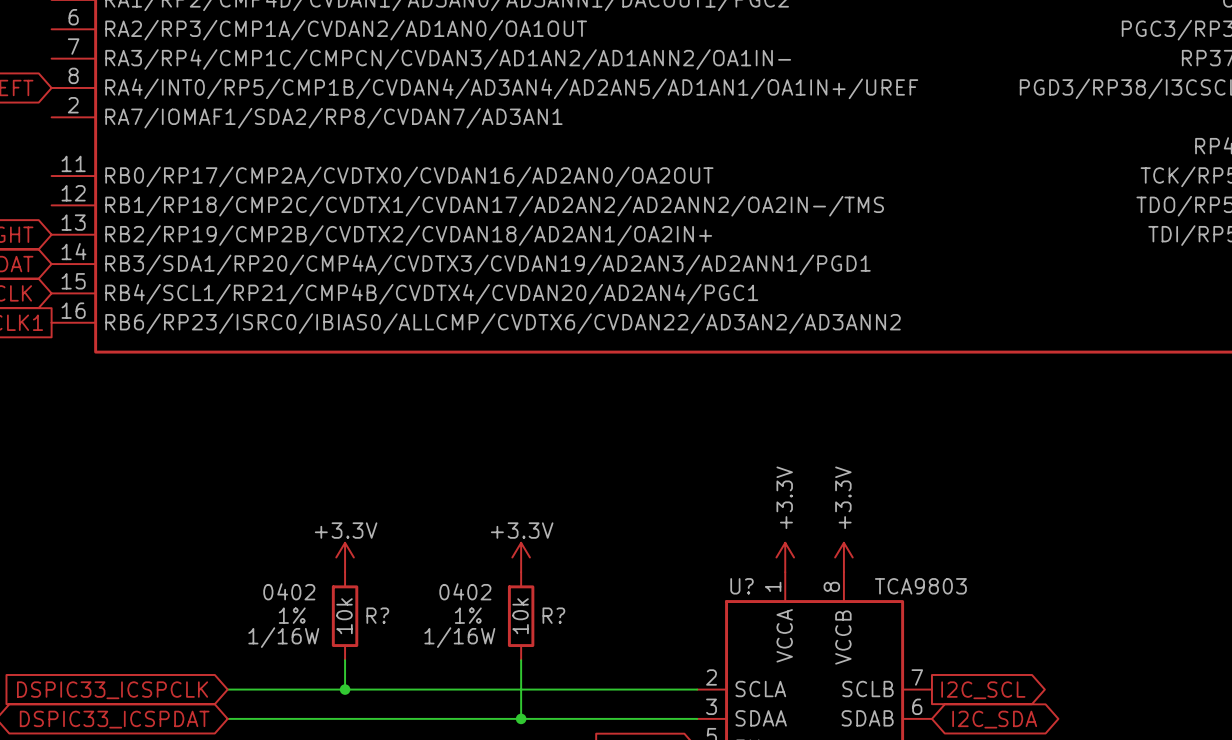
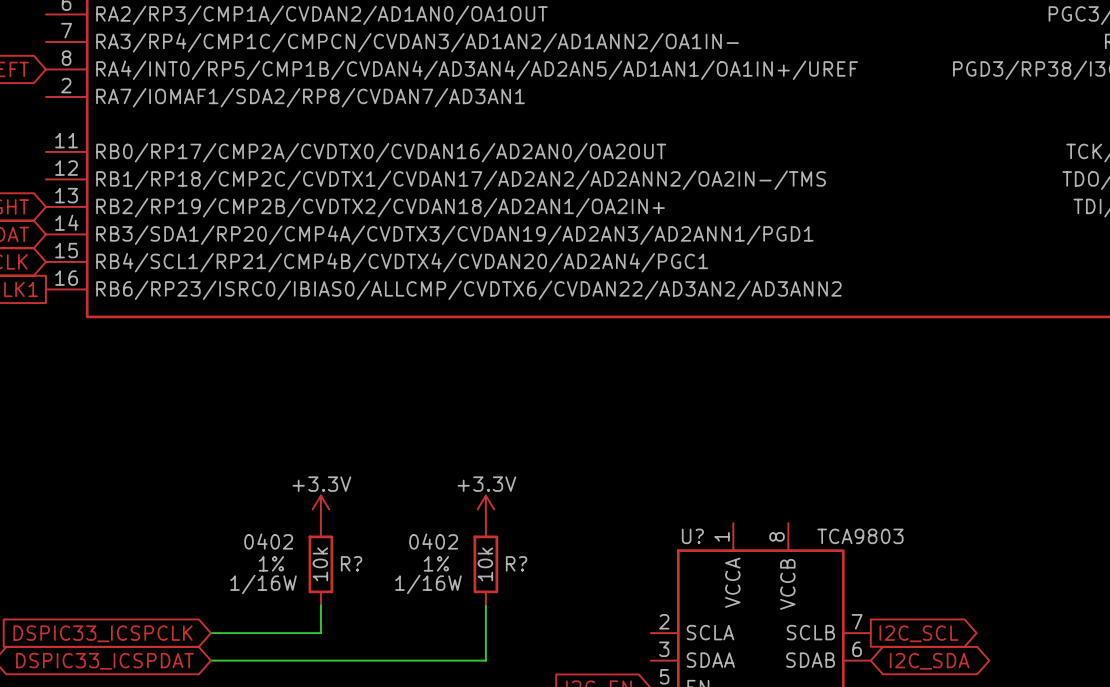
power symbol: +3.3V (785, 557) -> none
power symbol: +3.3V (843, 557) -> none
wire: (345, 689) (697, 689) -> none
junction: (345, 689) -> none
wire: (521, 718) (697, 718) -> none
junction: (521, 718) -> none

